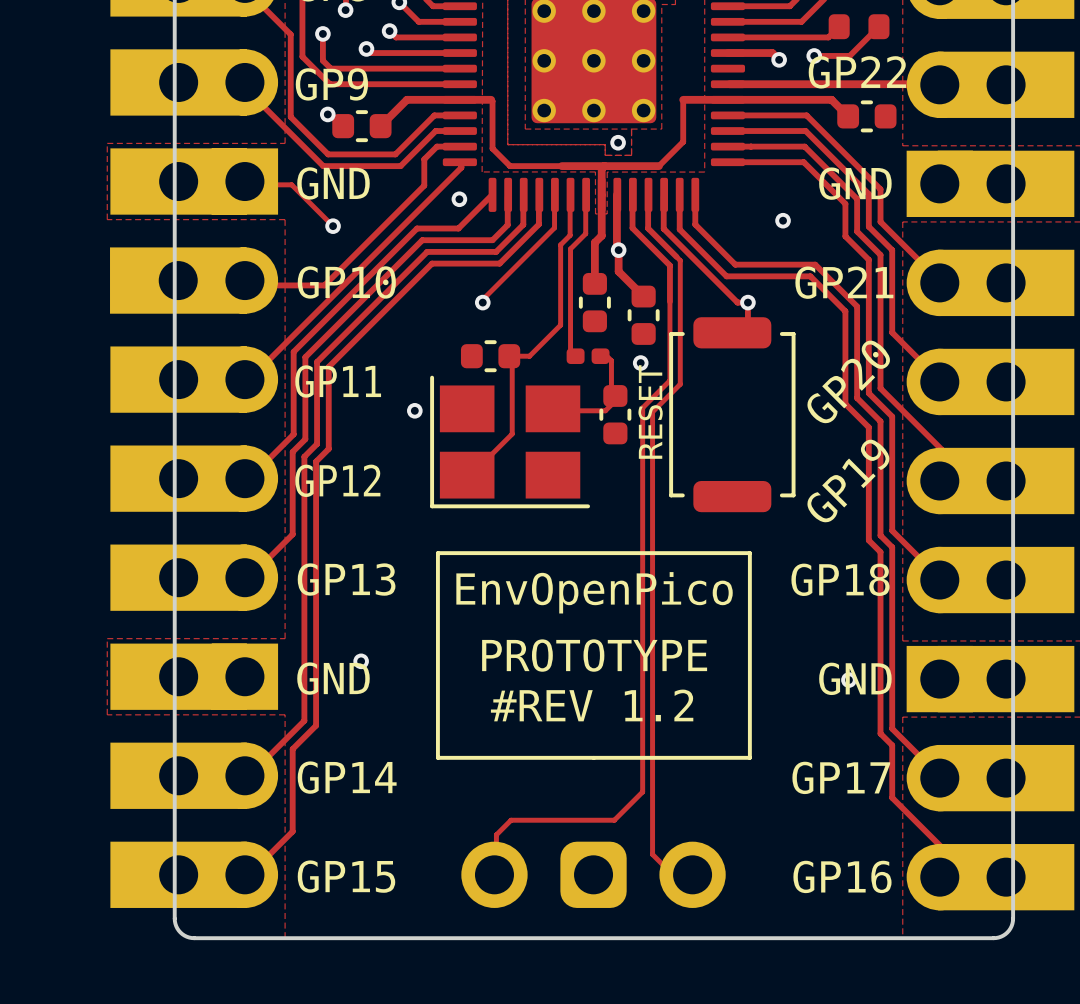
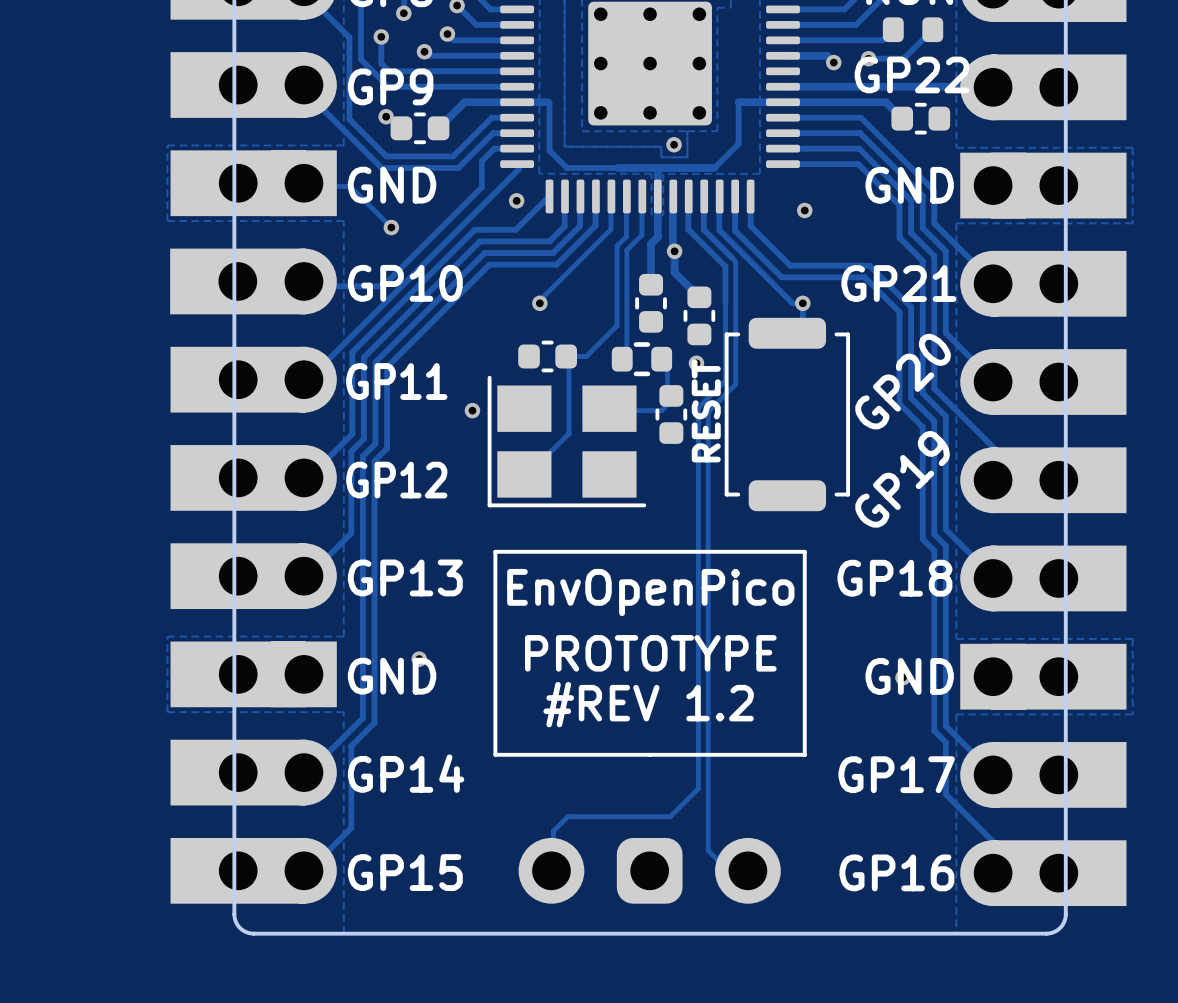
via position: (783, 220) -> (804, 210)
part footprint: [566, 348, 610, 365] -> [611, 342, 673, 377]

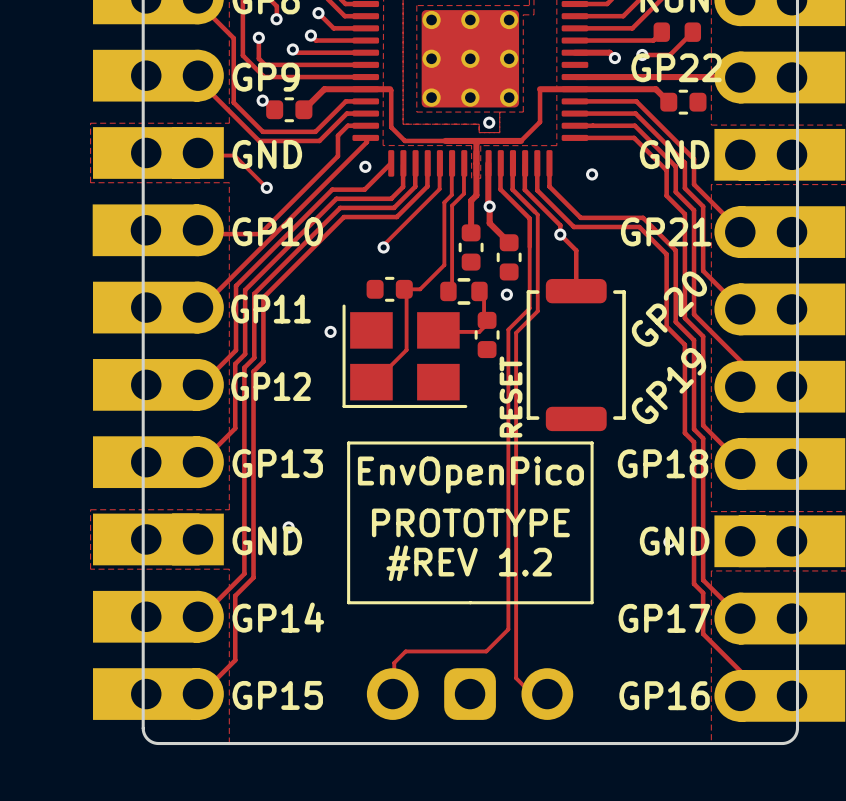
track: (764, 275) (792, 303) (802, 303) (802, 320) -> (560, 225) (560, 234) (576, 250) (576, 291)
via position: (802, 303) -> (560, 234)
part footprint: [724, 317, 851, 512] -> [526, 278, 626, 432]
text position: RESET (706, 410) -> RESET (511, 396)

